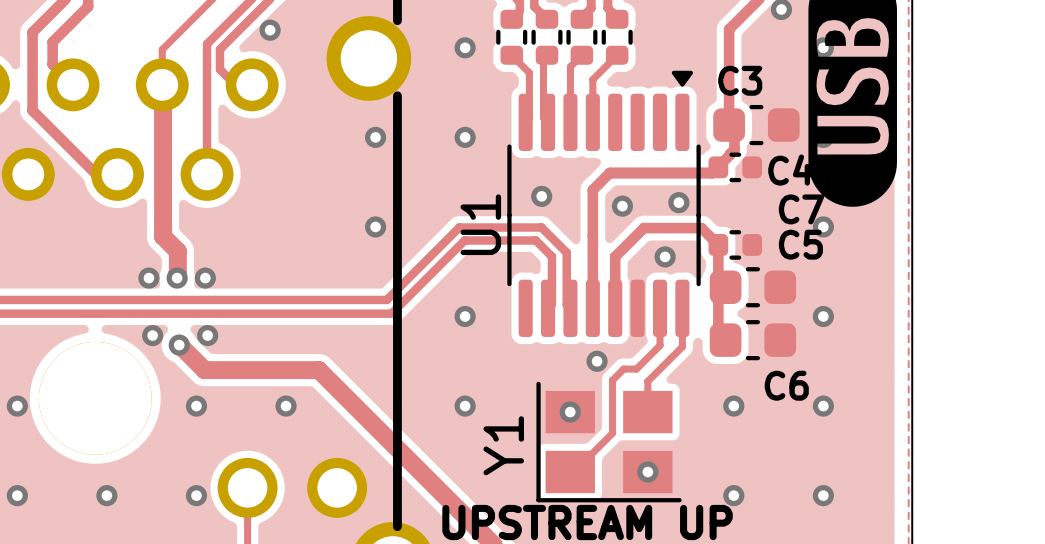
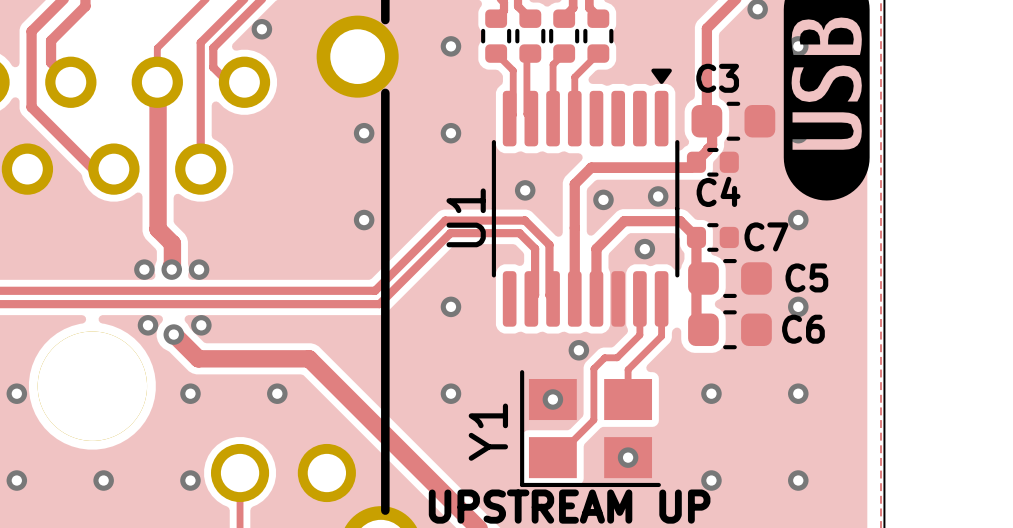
C4 name position: C4 (790, 170) -> C4 (718, 191)
C7 name position: C7 (801, 209) -> C7 (766, 236)
C5 name position: C5 (800, 244) -> C5 (806, 277)
C6 name position: C6 (786, 385) -> C6 (803, 329)

